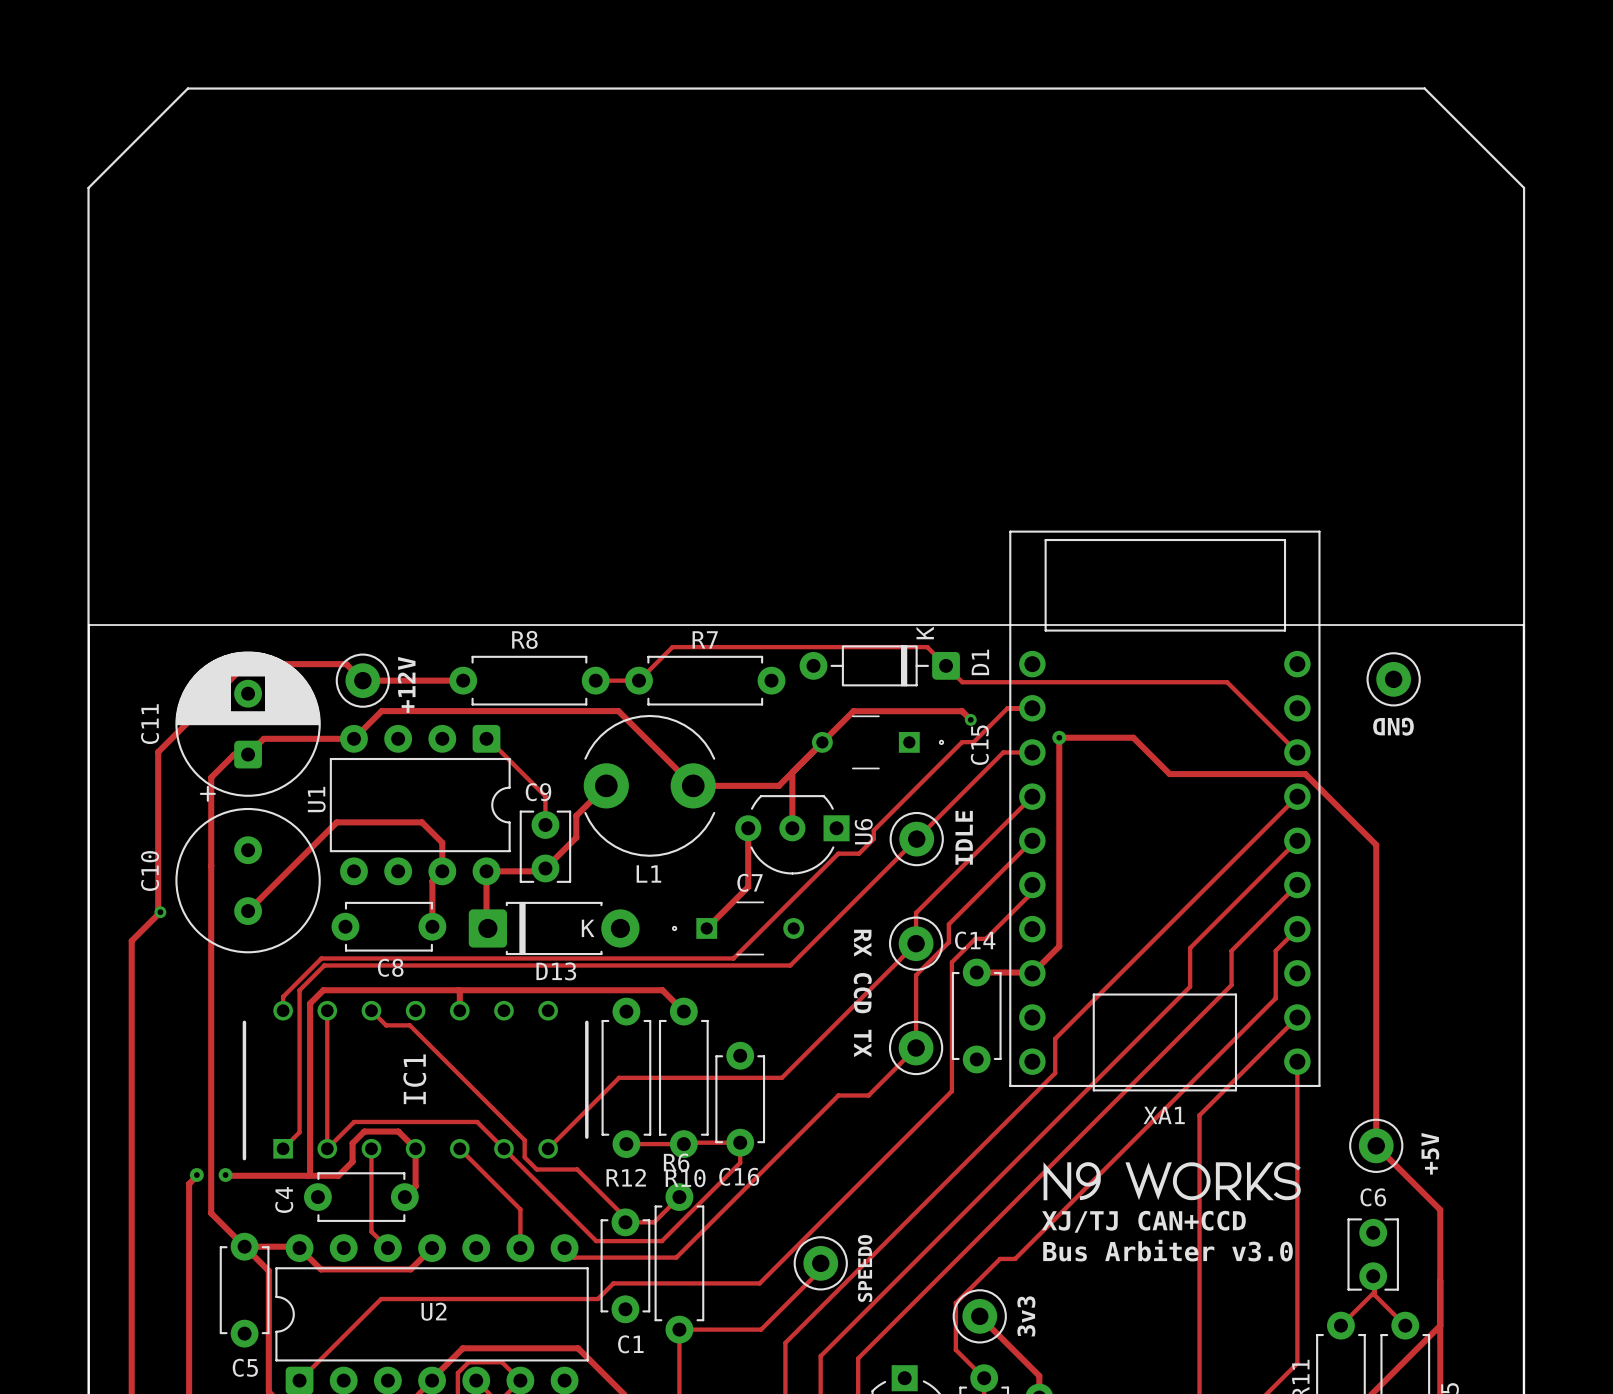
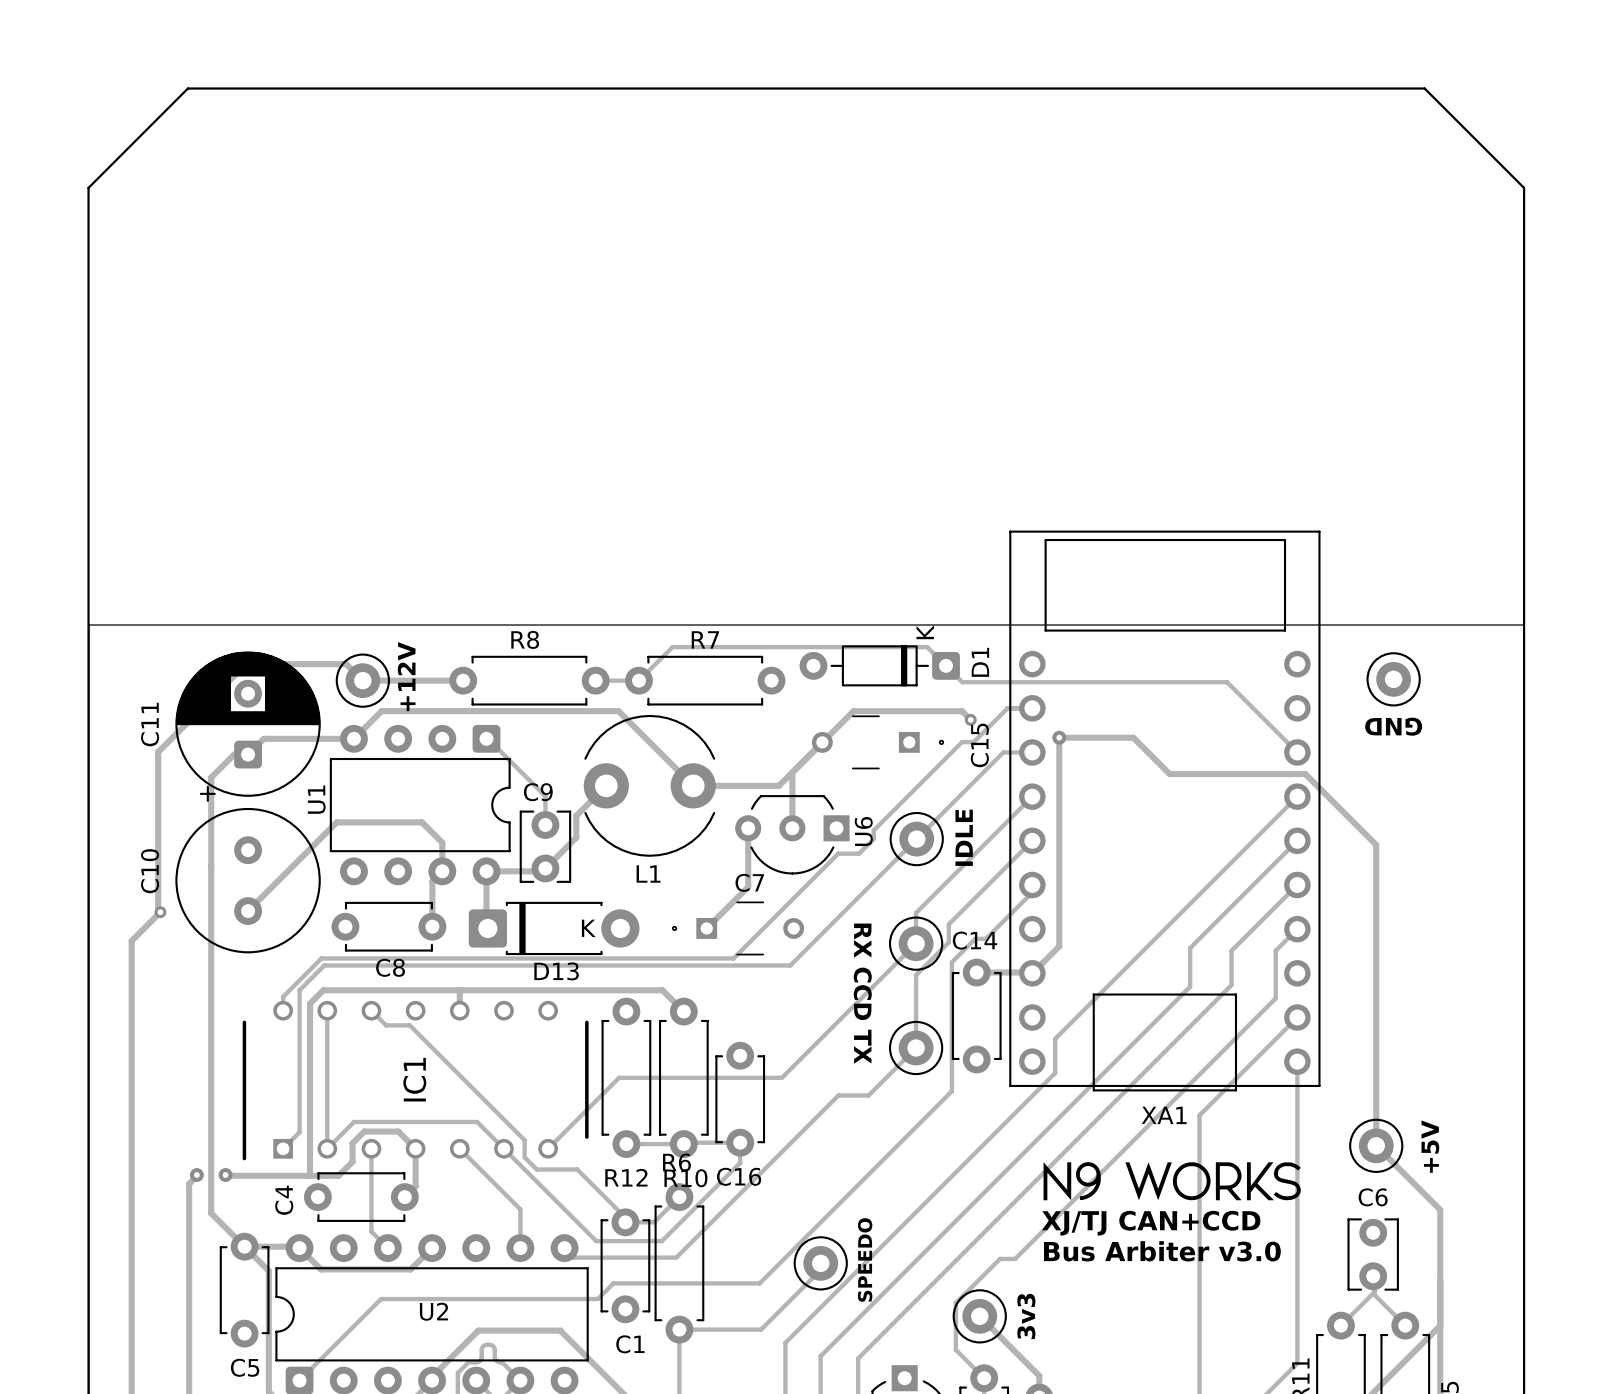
track: (578, 1348) (462, 1348) (432, 1379) -> (578, 1348) (560, 1330) (478, 1330) (432, 1376) (432, 1380)
track: (476, 1362) (500, 1362) -> (476, 1362) (481, 1359) (482, 1348) (486, 1344) (493, 1346) (495, 1359) (500, 1362)

